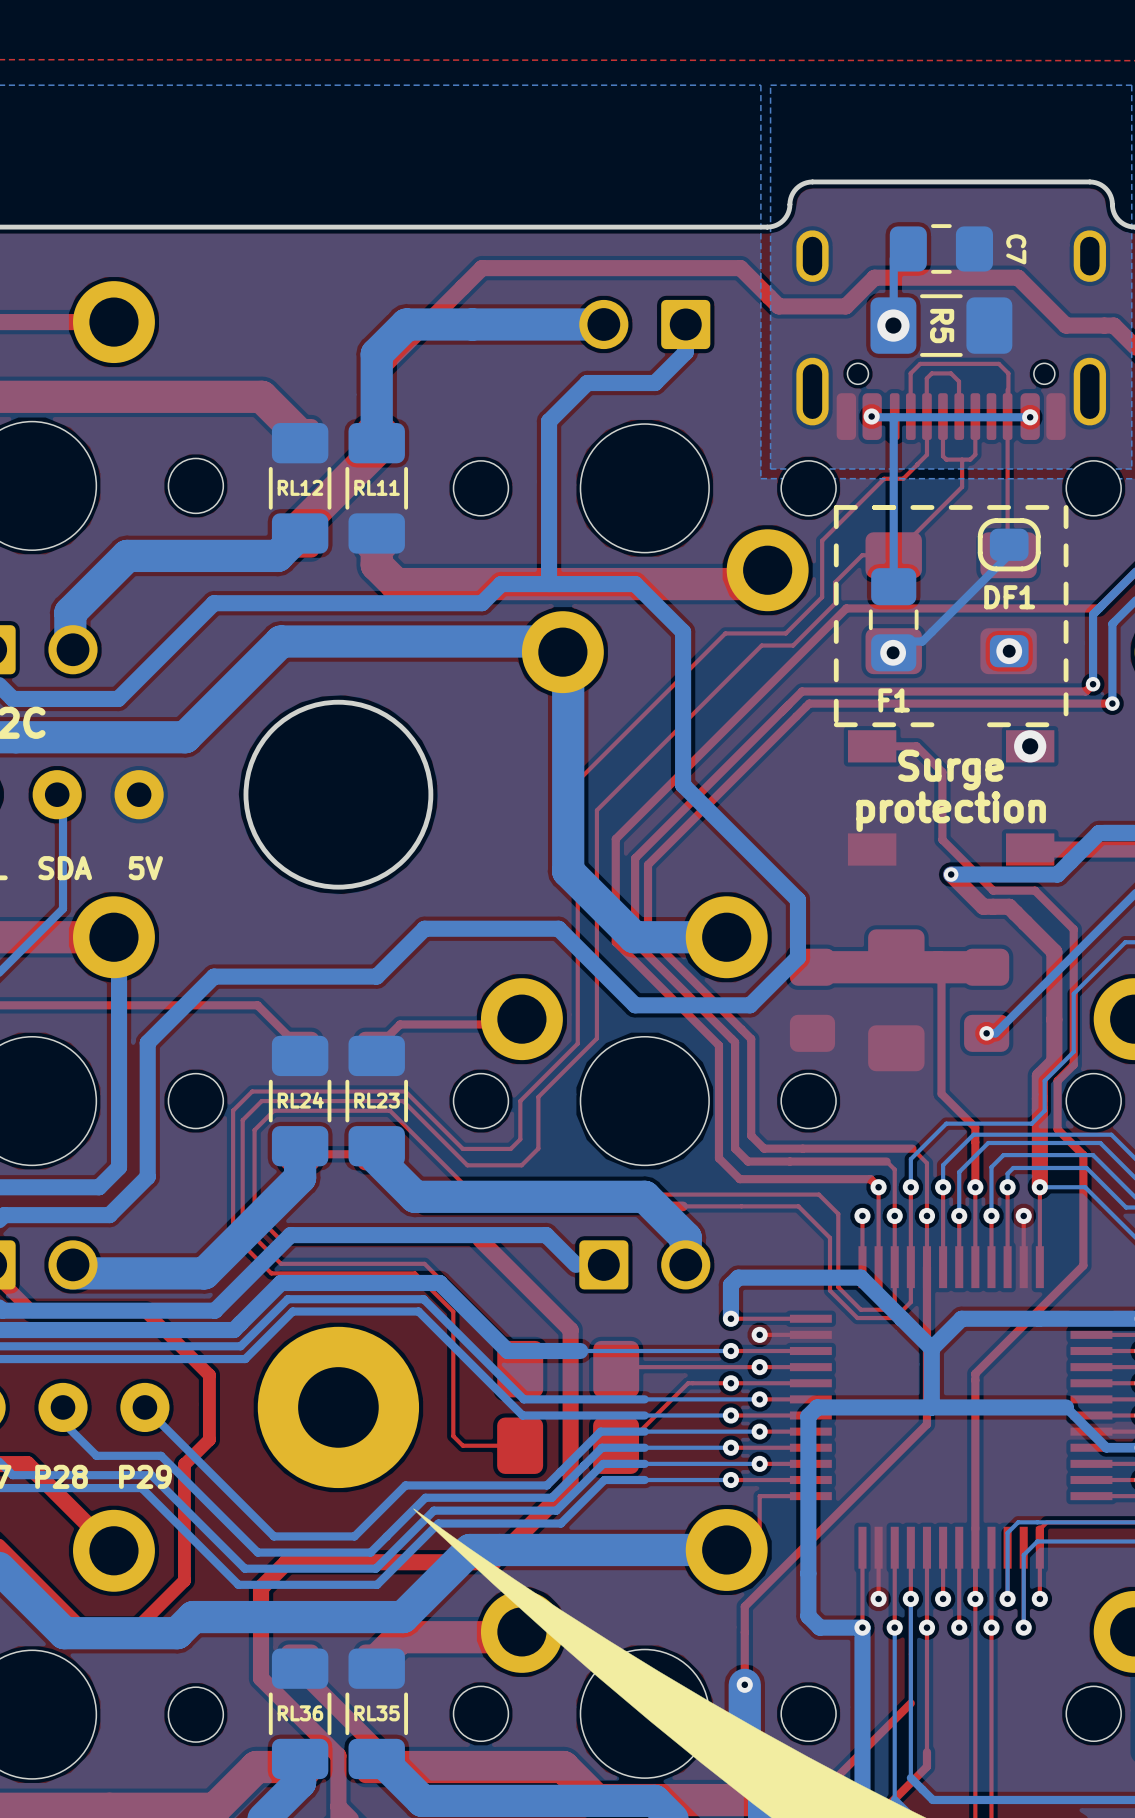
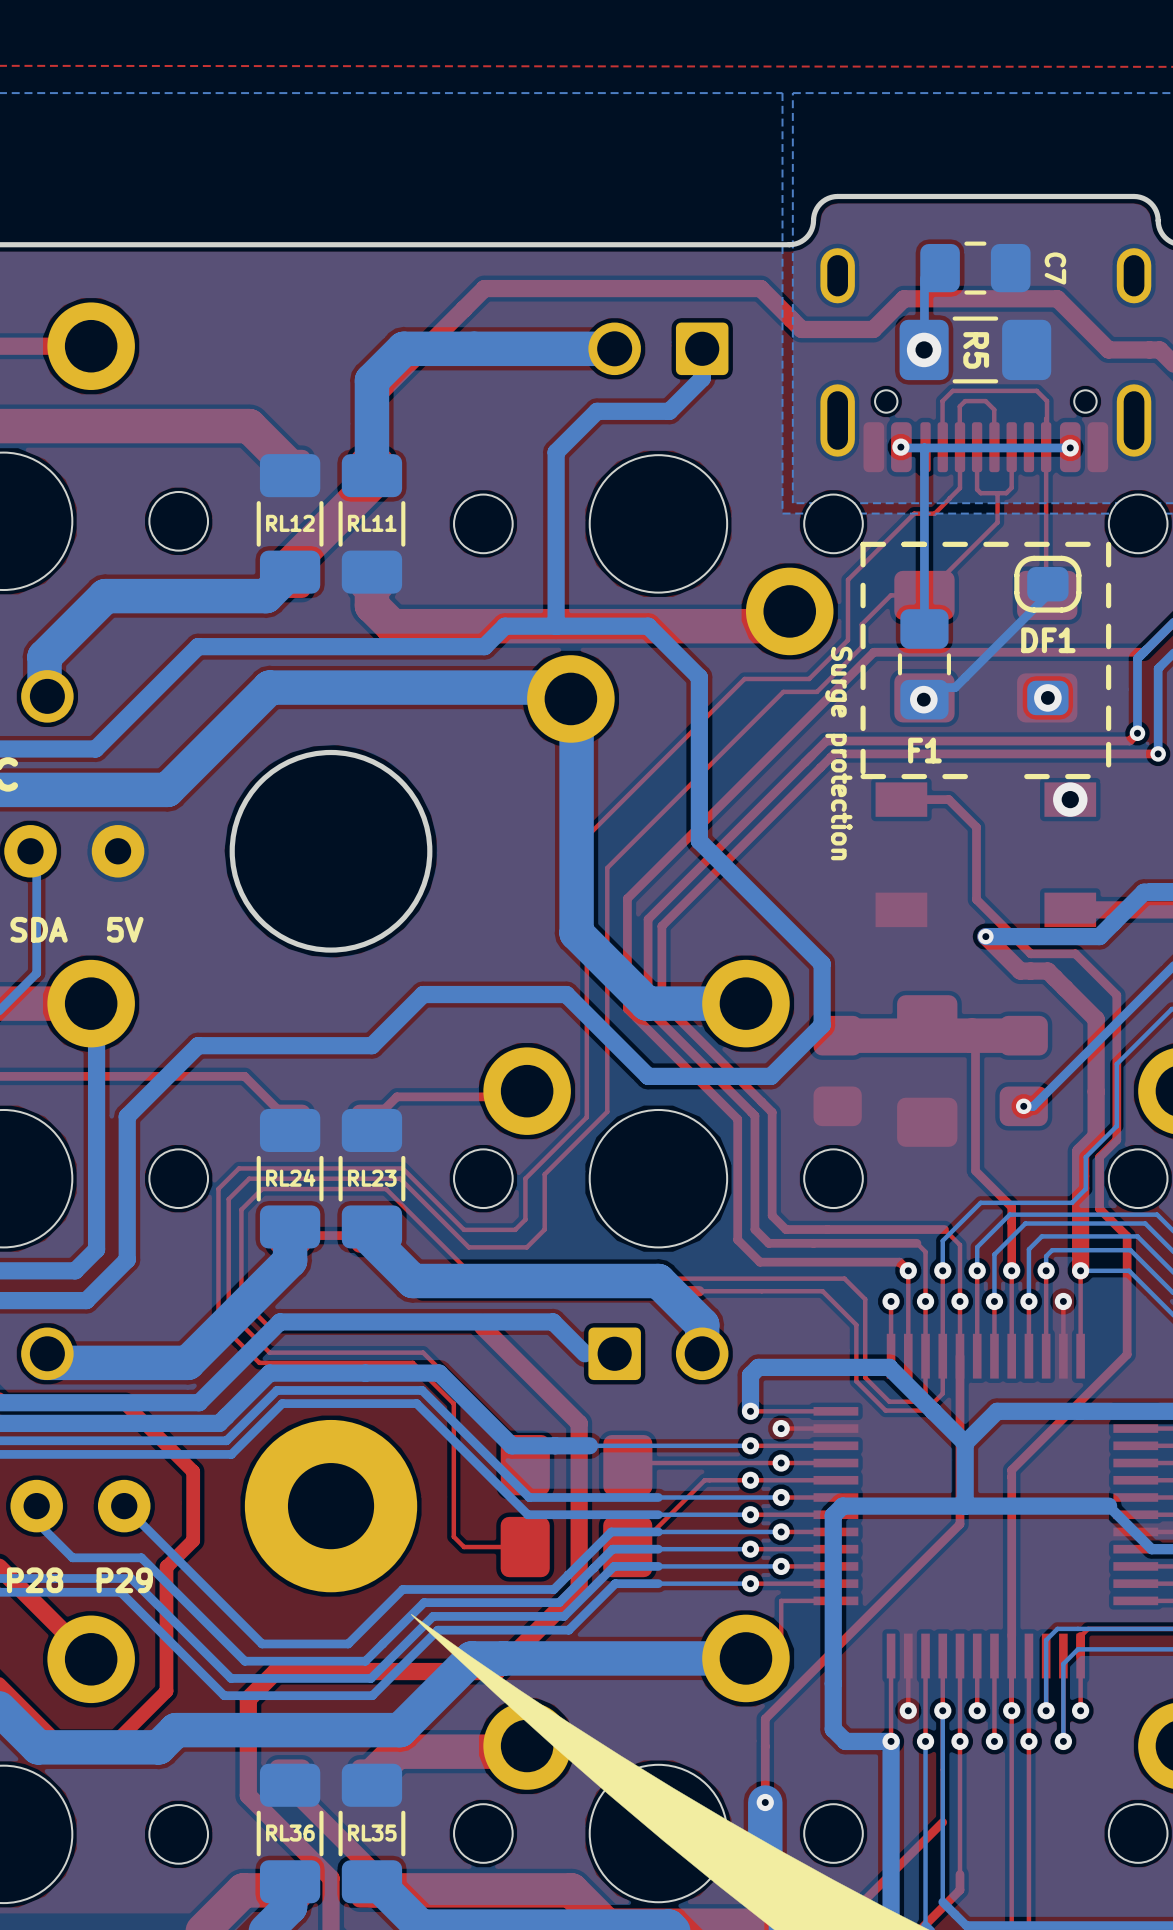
text: Surge (951, 770) -> none
text: protection (951, 811) -> Surge protection (838, 753)

